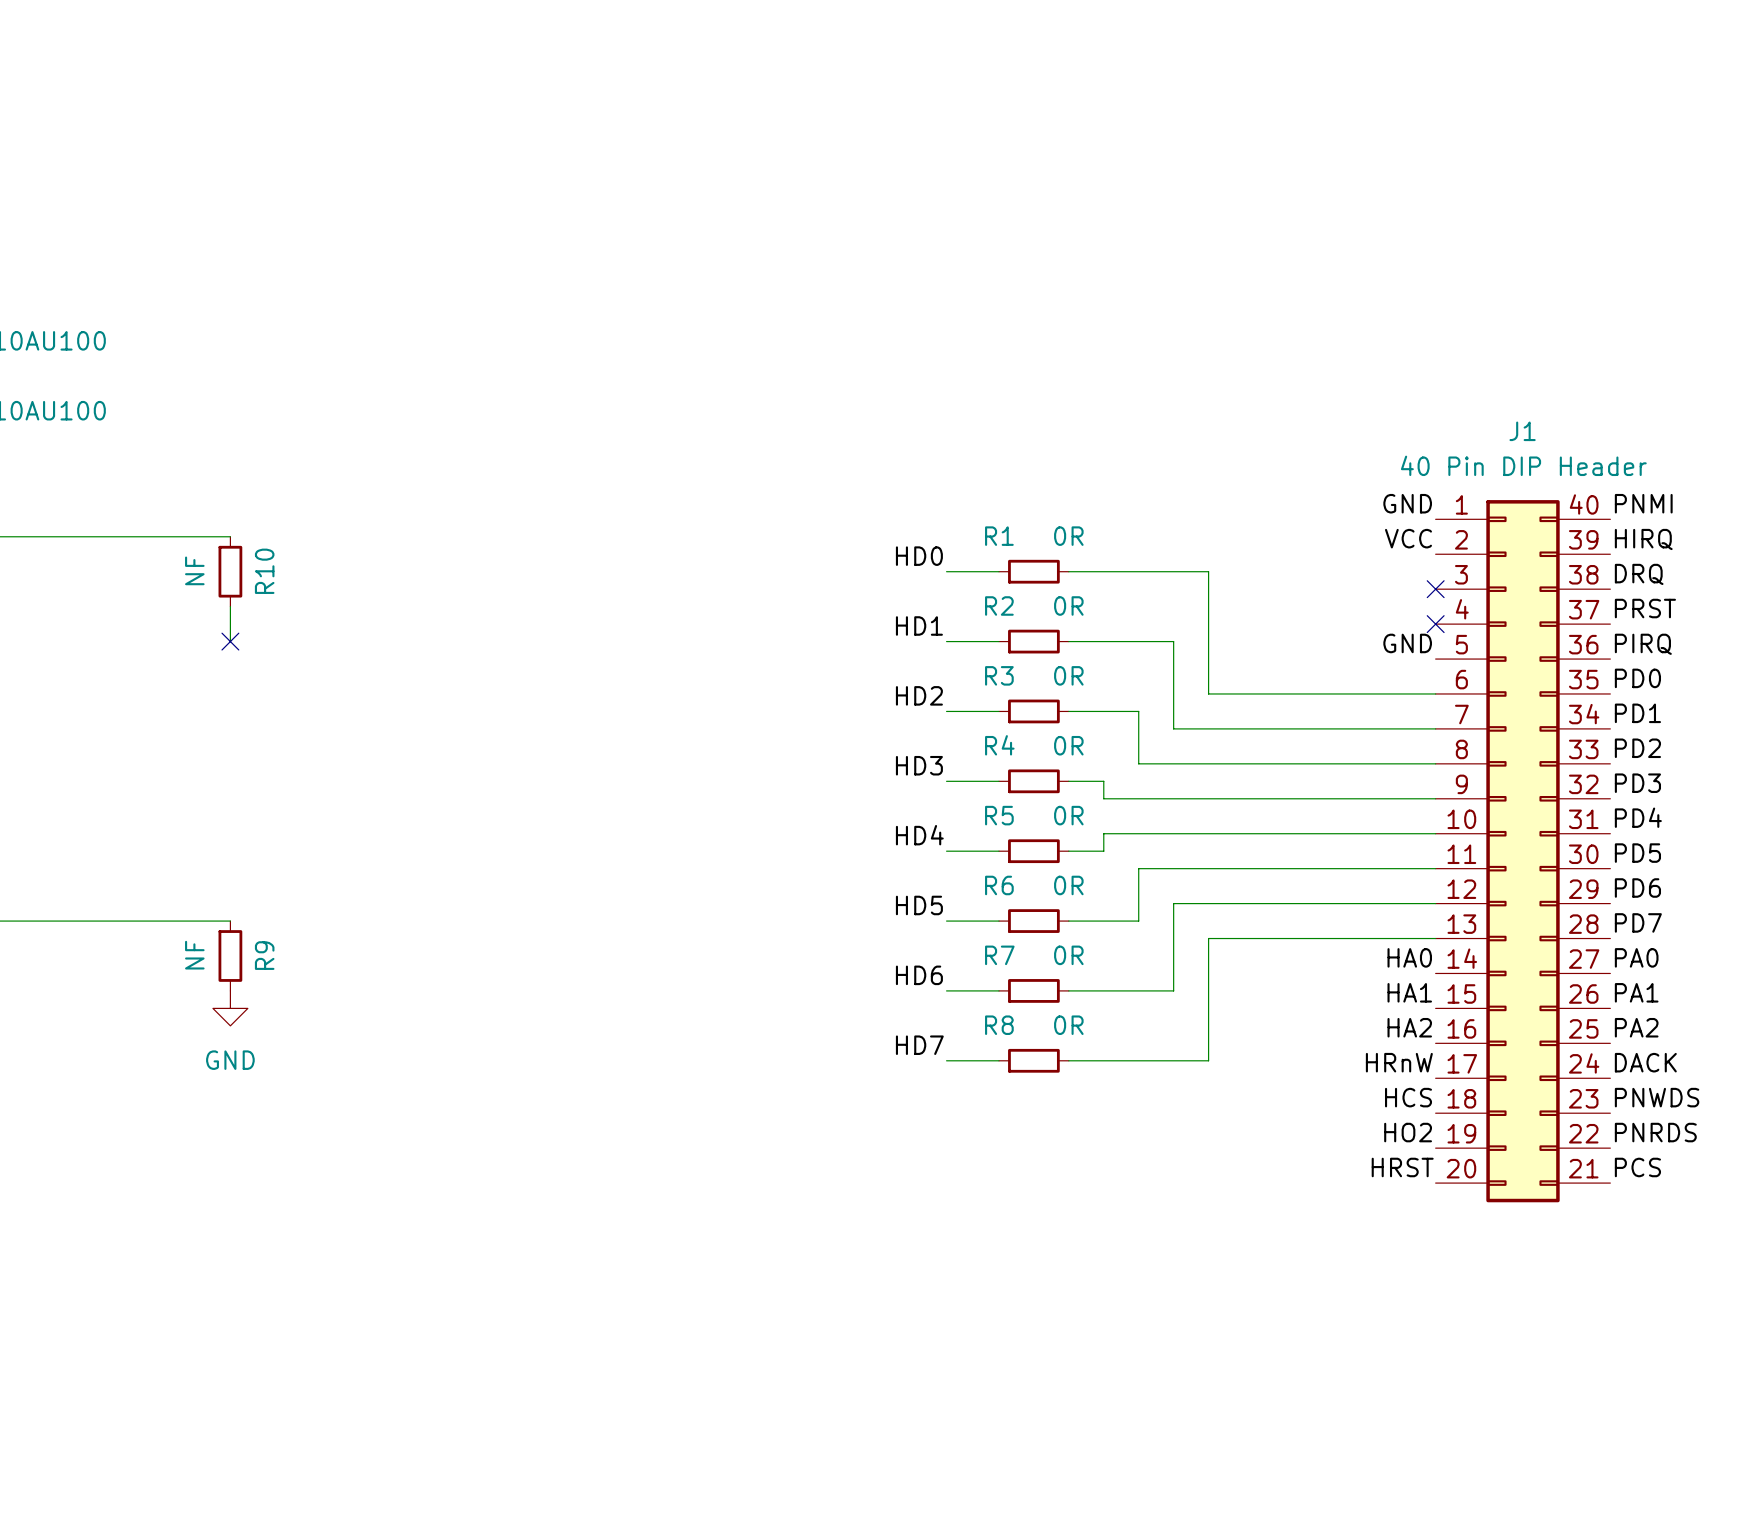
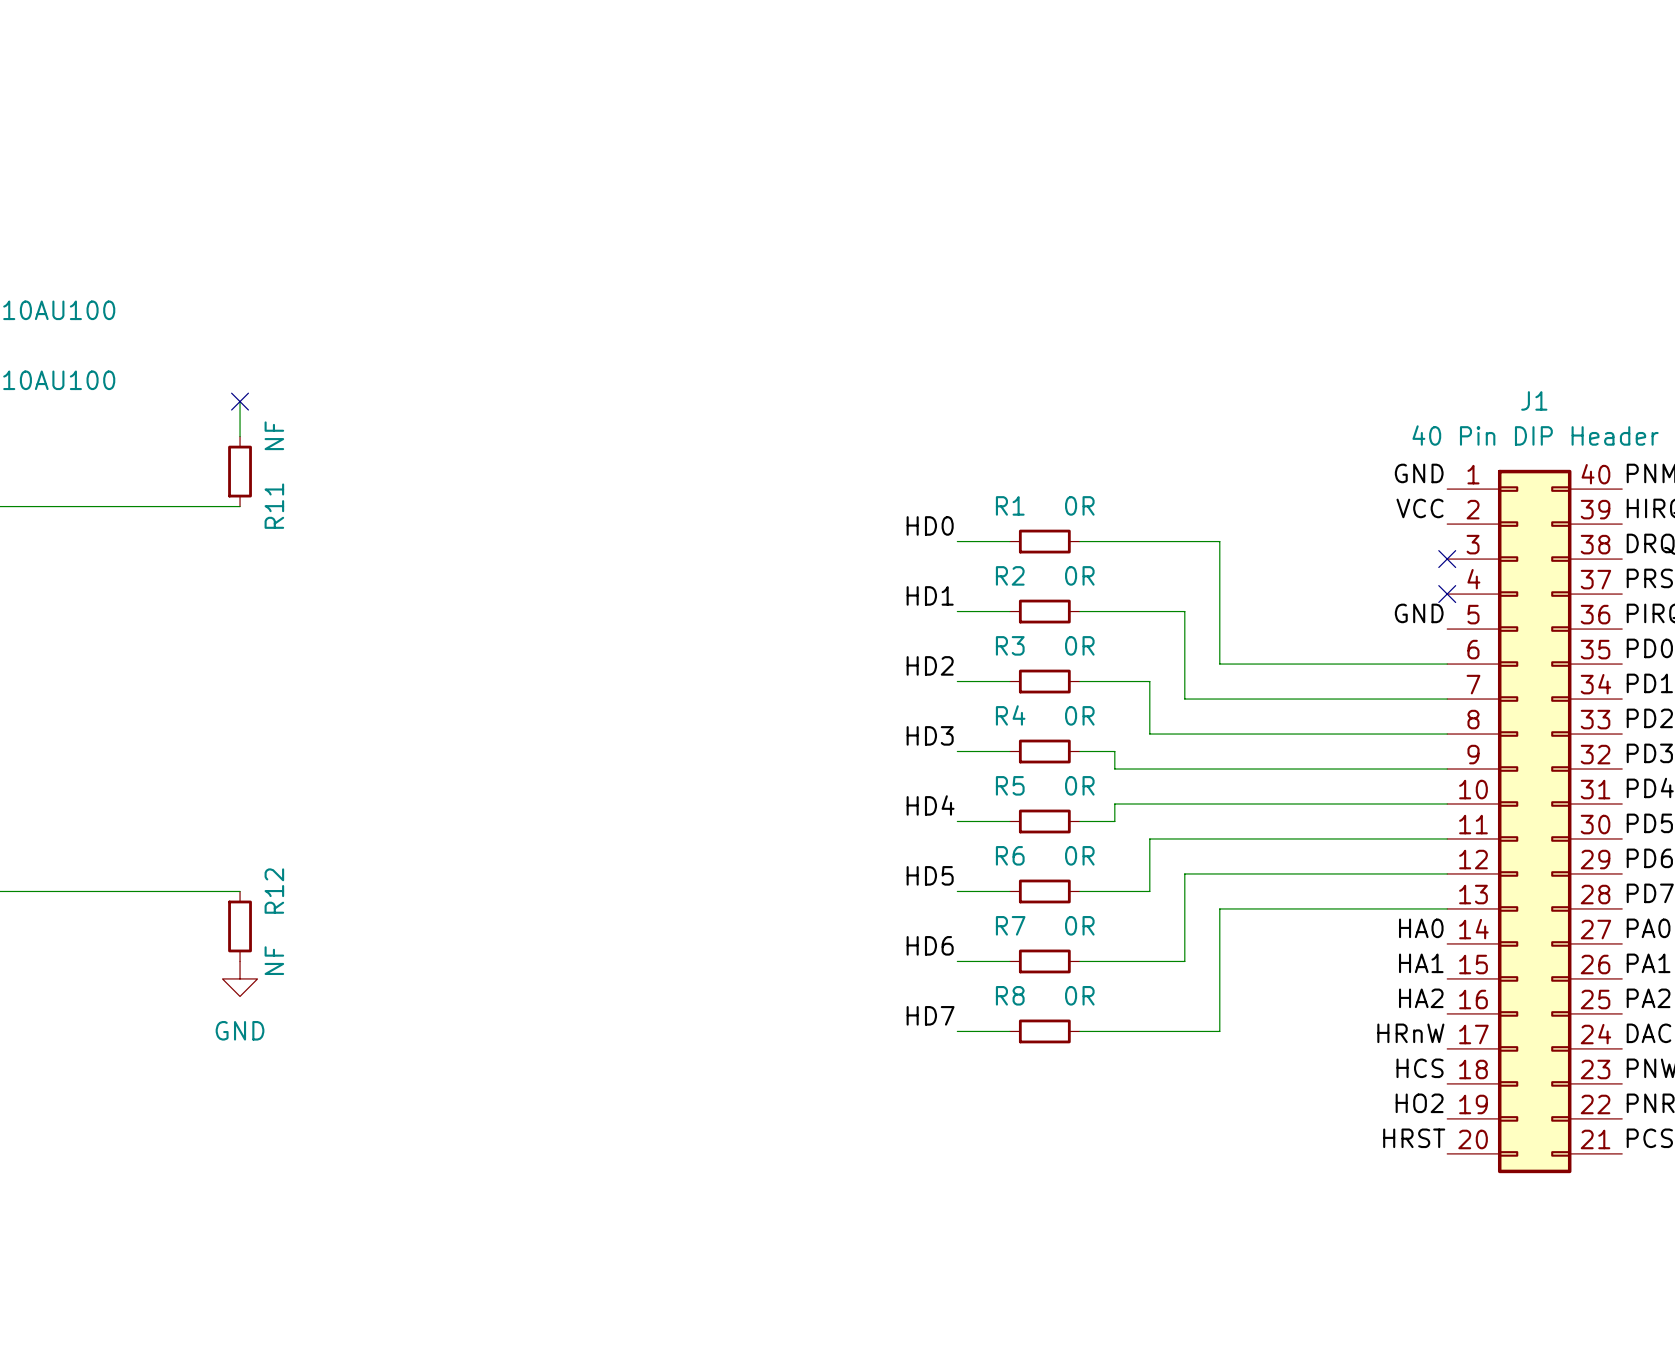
no-connect mark: none -> (240, 401)
R11: none -> NF (240, 471)
R10: NF (230, 571) -> none
wire: (230, 606) (230, 641) -> (240, 401) (240, 436)
no-connect mark: (230, 641) -> none
R9 value position: NF (194, 955) -> NF (274, 960)
R9 name: R9 (264, 955) -> R12 (274, 891)

